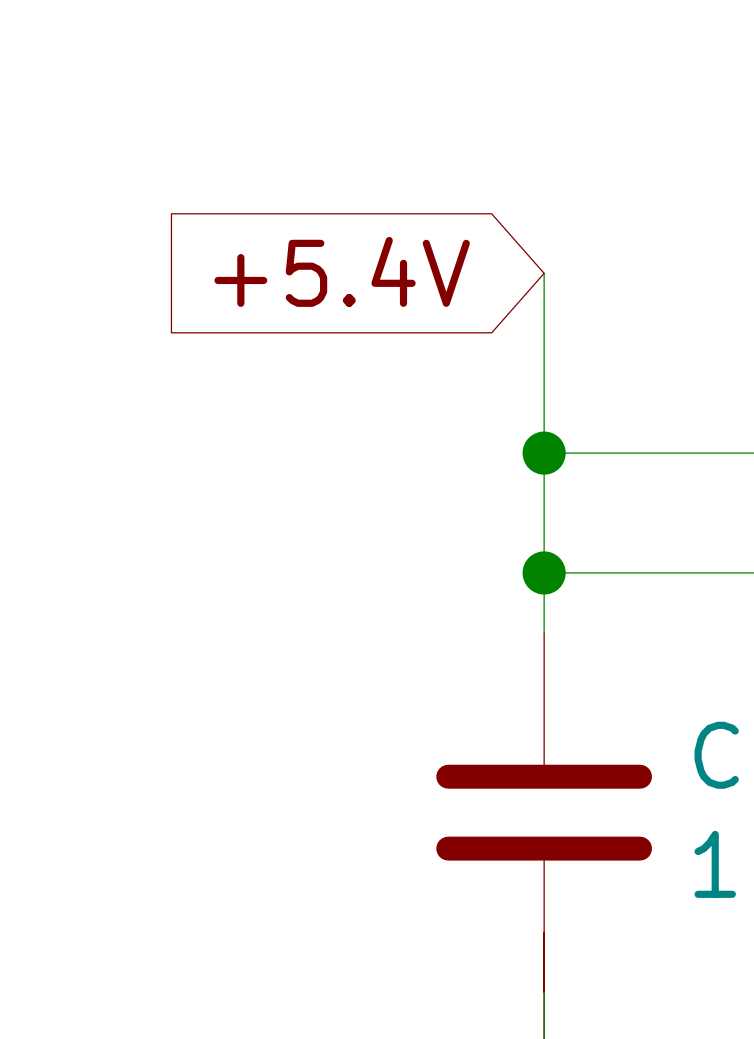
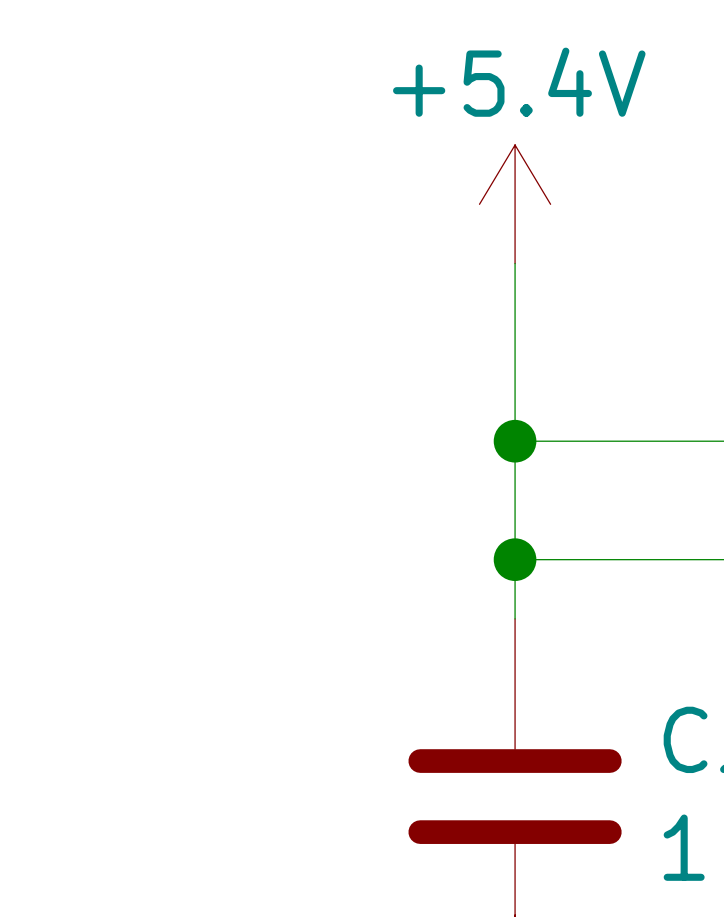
power symbol: none -> +5.4V (515, 204)
global label: +5.4V (342, 271) -> none

